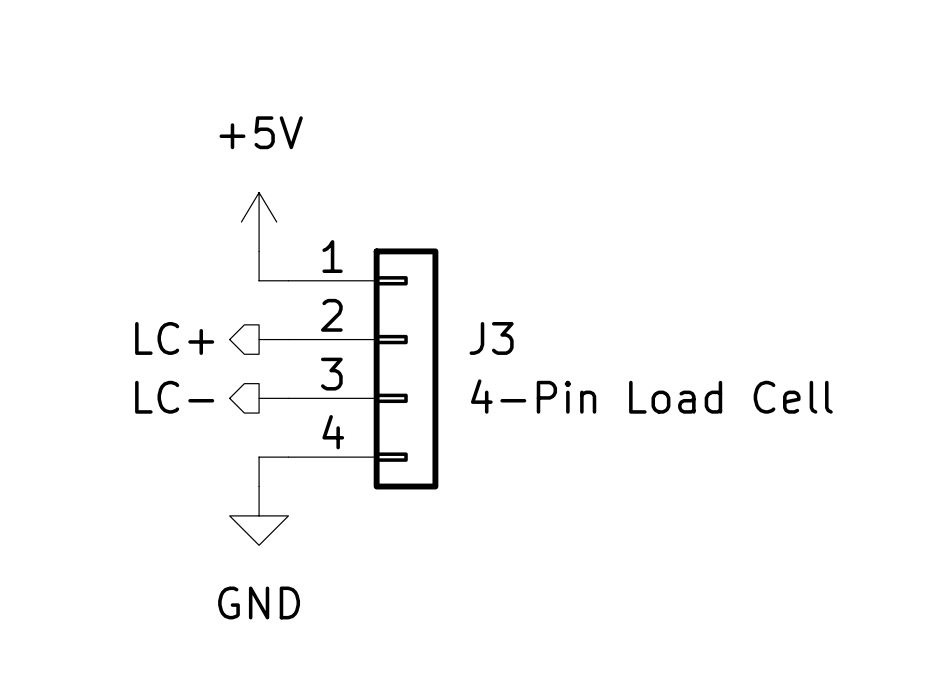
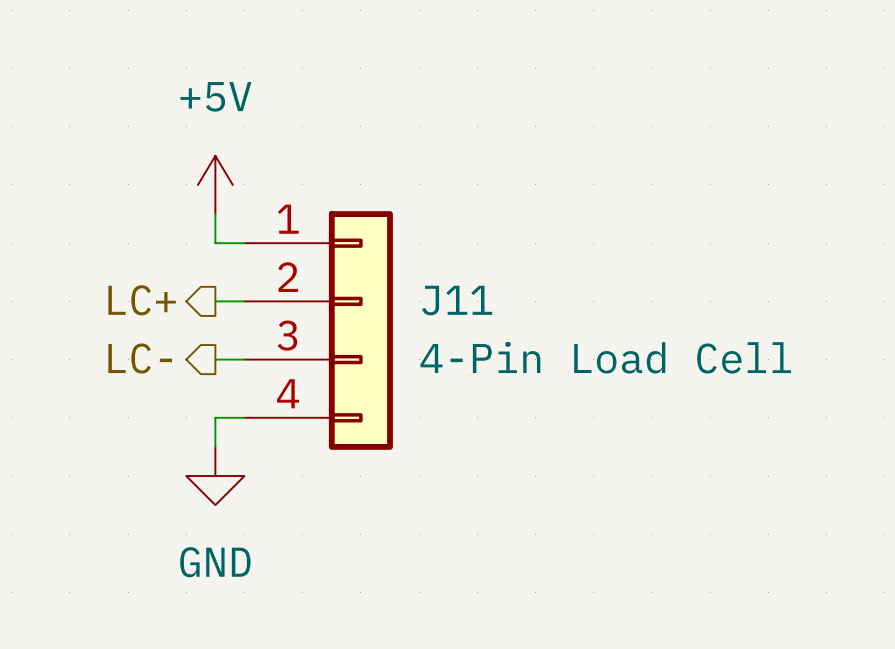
J3 name: J3 (491, 338) -> J11 (457, 300)

